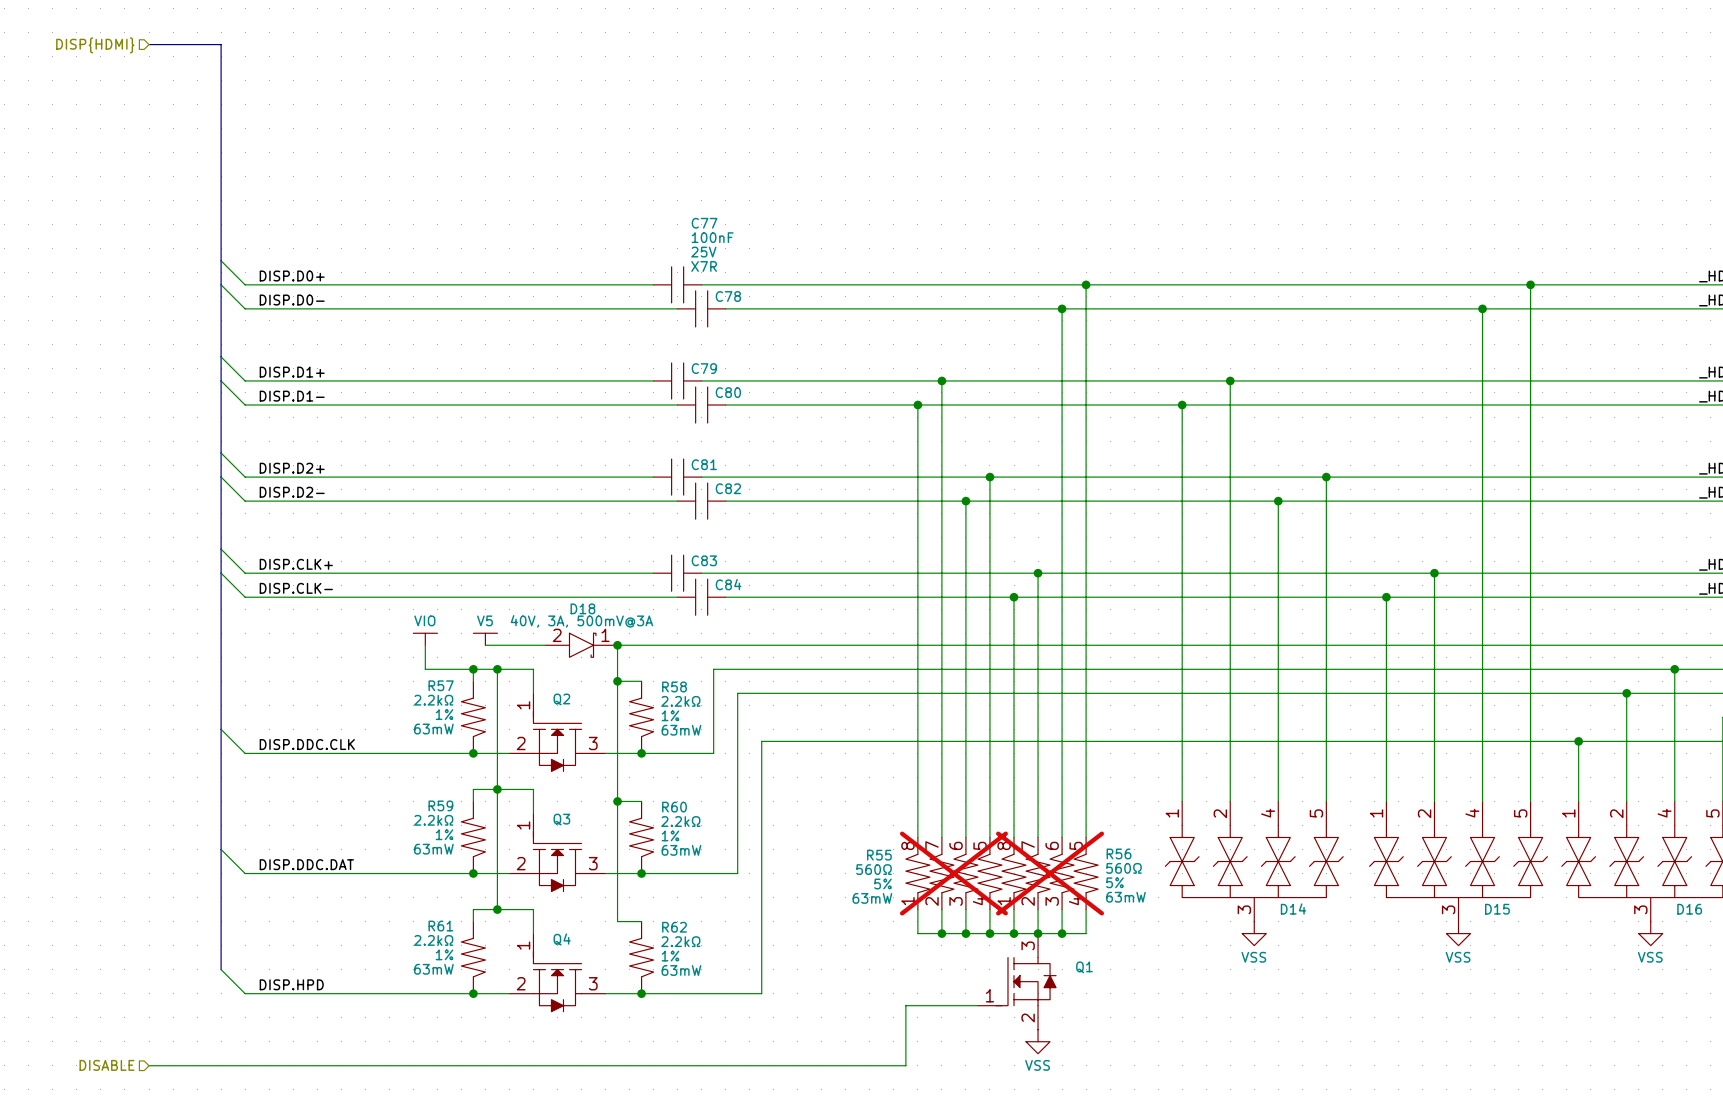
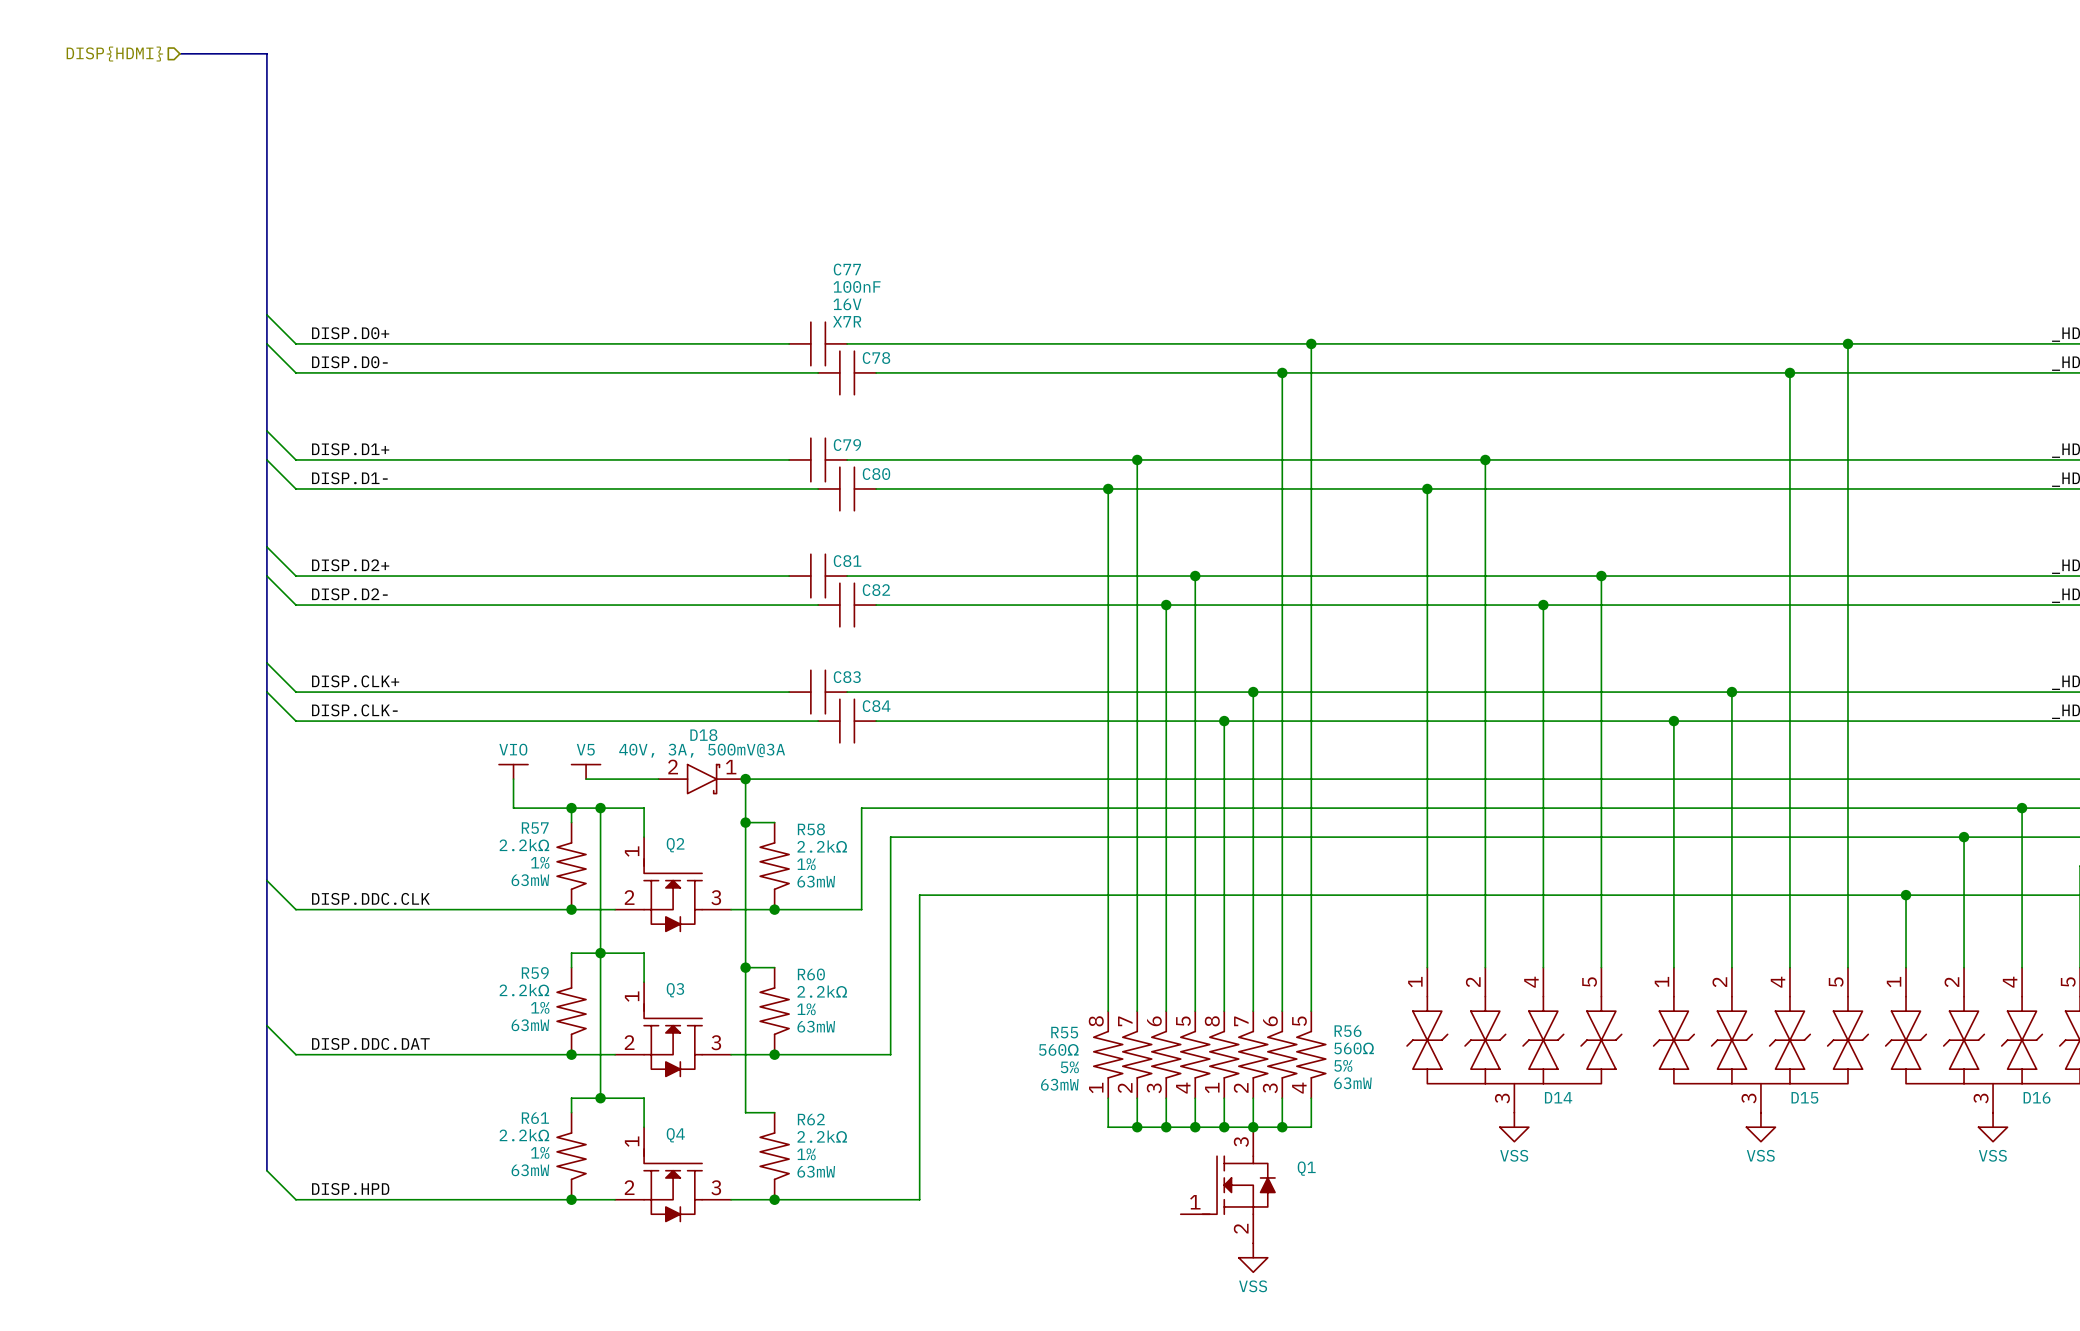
C77 text: 25V (703, 252) -> 16V (847, 304)
R55 do-not-place cross: (953, 873) -> none
R56 do-not-place cross: (1050, 873) -> none
wire: (977, 1005) (905, 1005) (905, 1065) (149, 1065) -> none
hierarchical label: DISABLE (106, 1065) -> none

